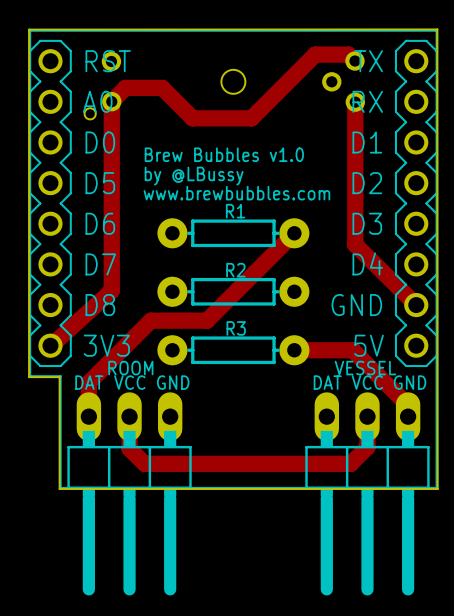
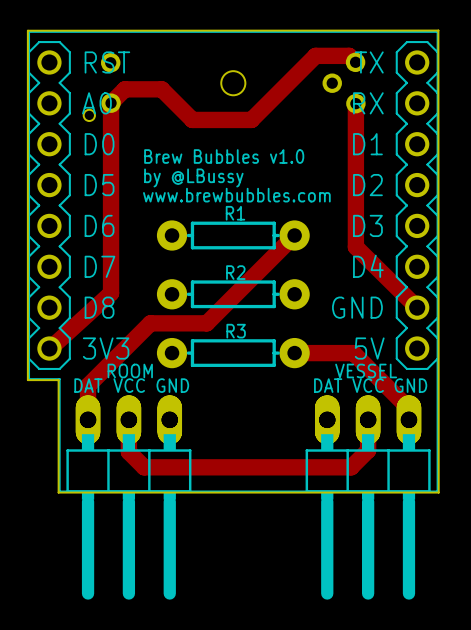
part: none -> (128, 419)
part: none -> (368, 419)

